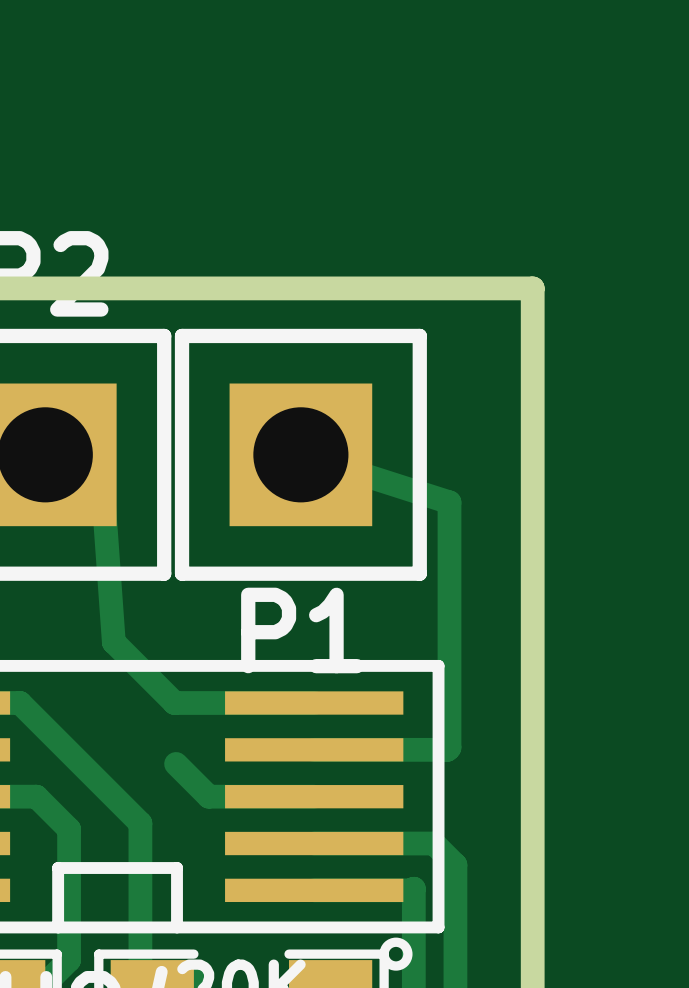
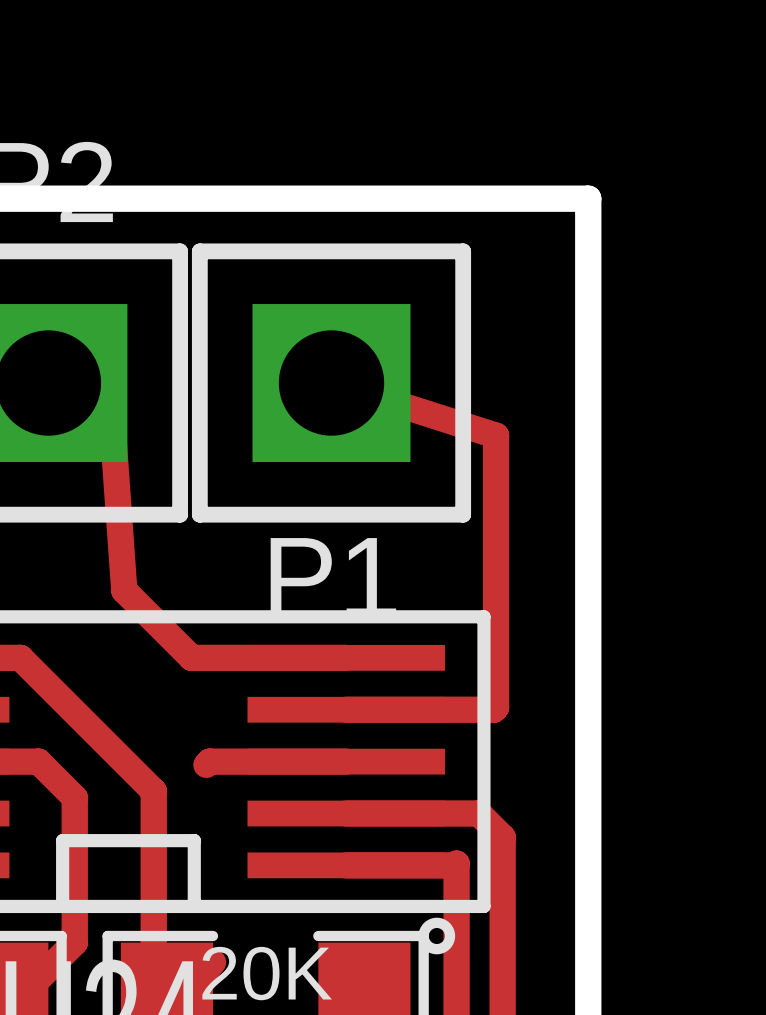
track: (176, 763) (208, 796) -> (206, 764) (209, 761) (229, 761)

